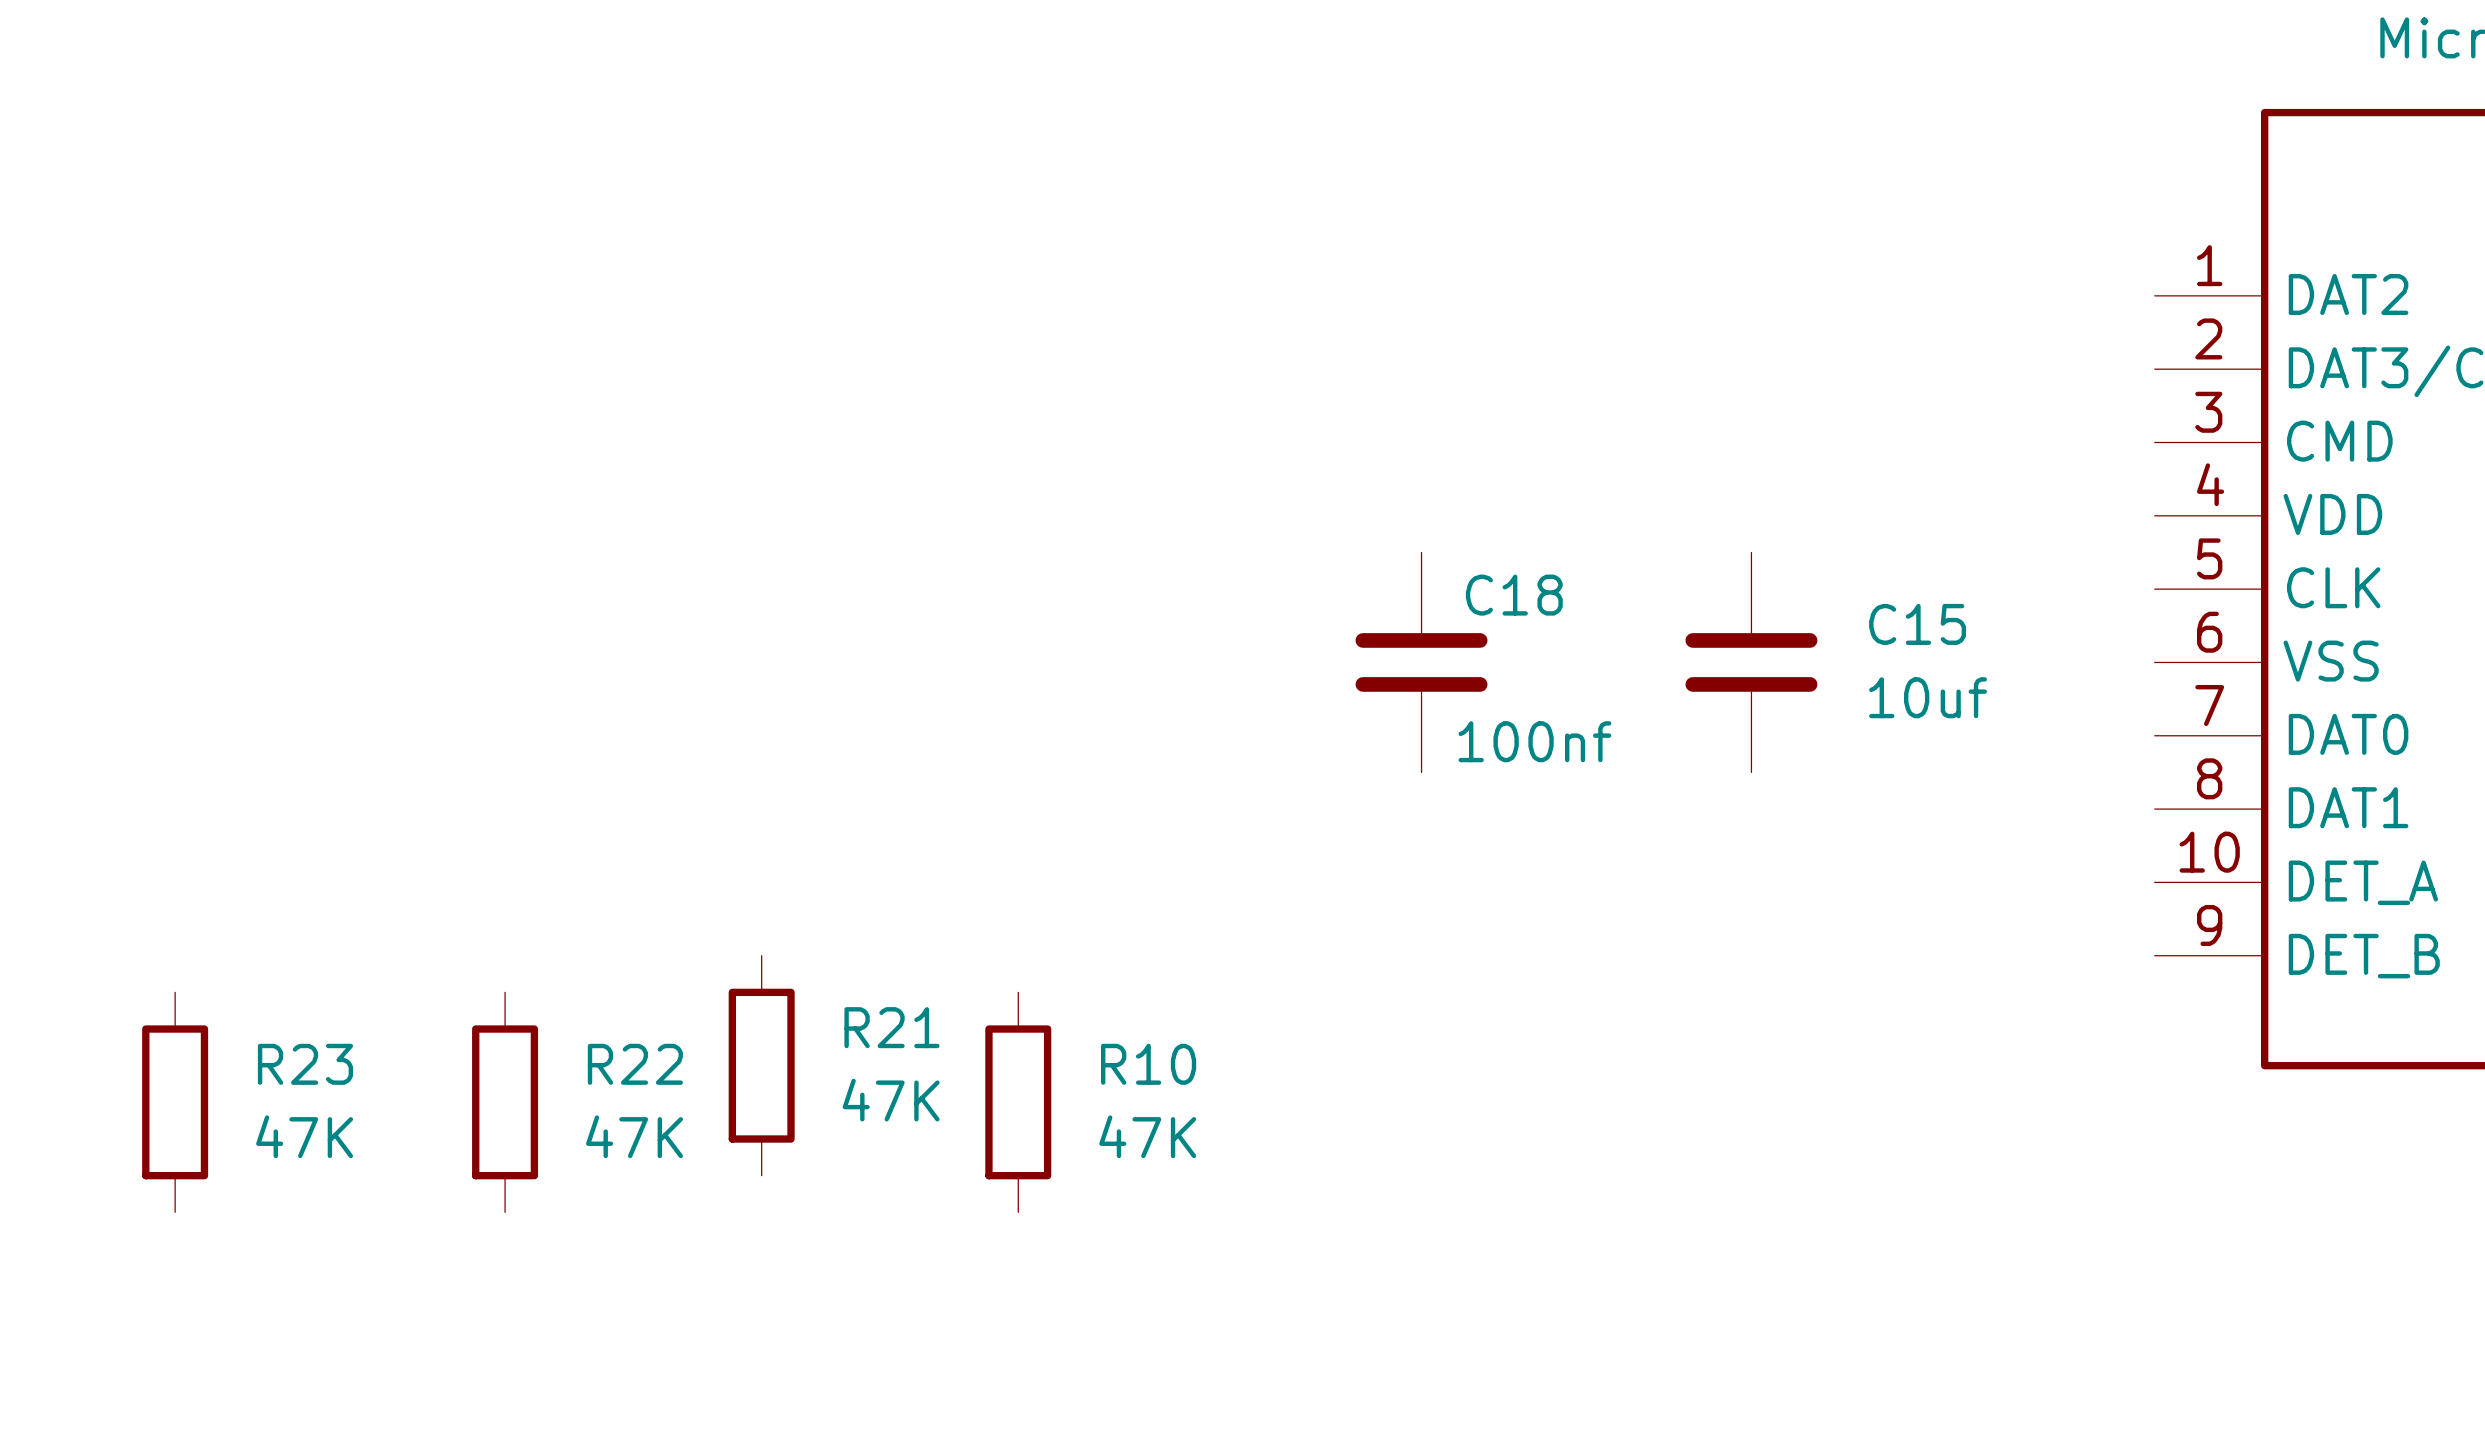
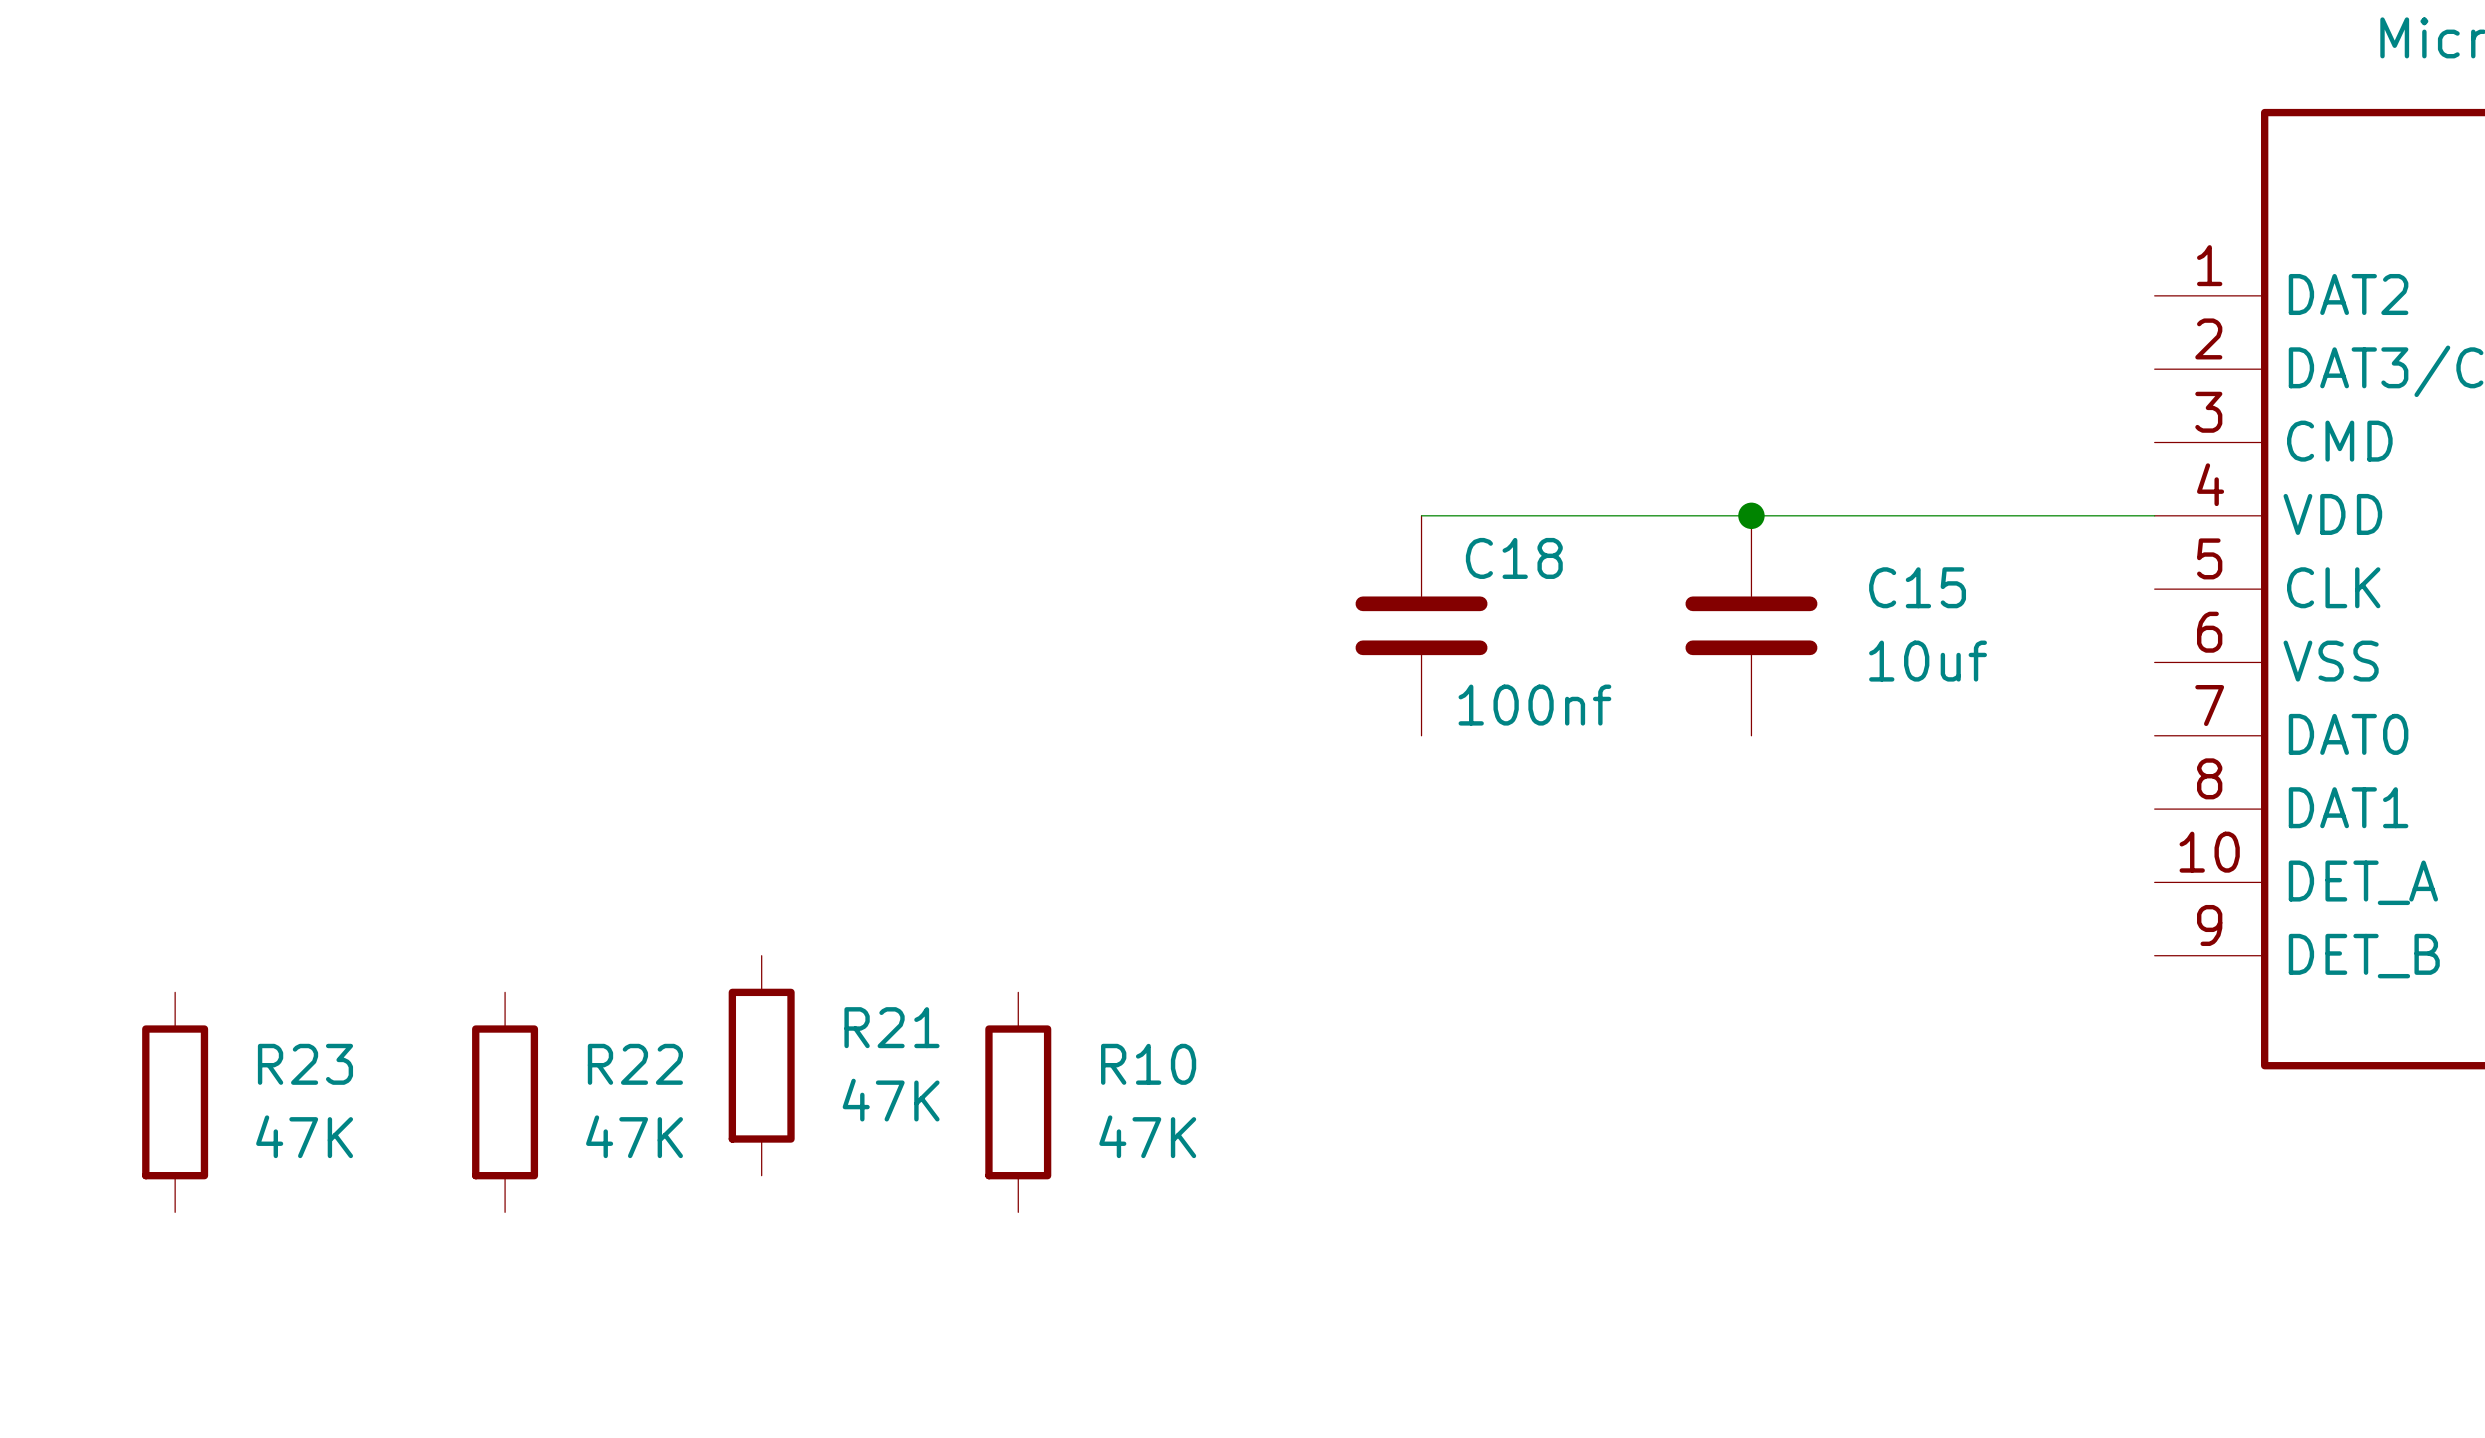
wire: none -> (1421, 515) (2154, 515)
junction: none -> (1751, 515)
C18 position: (1421, 662) -> (1421, 625)
C15 position: (1751, 662) -> (1751, 625)

